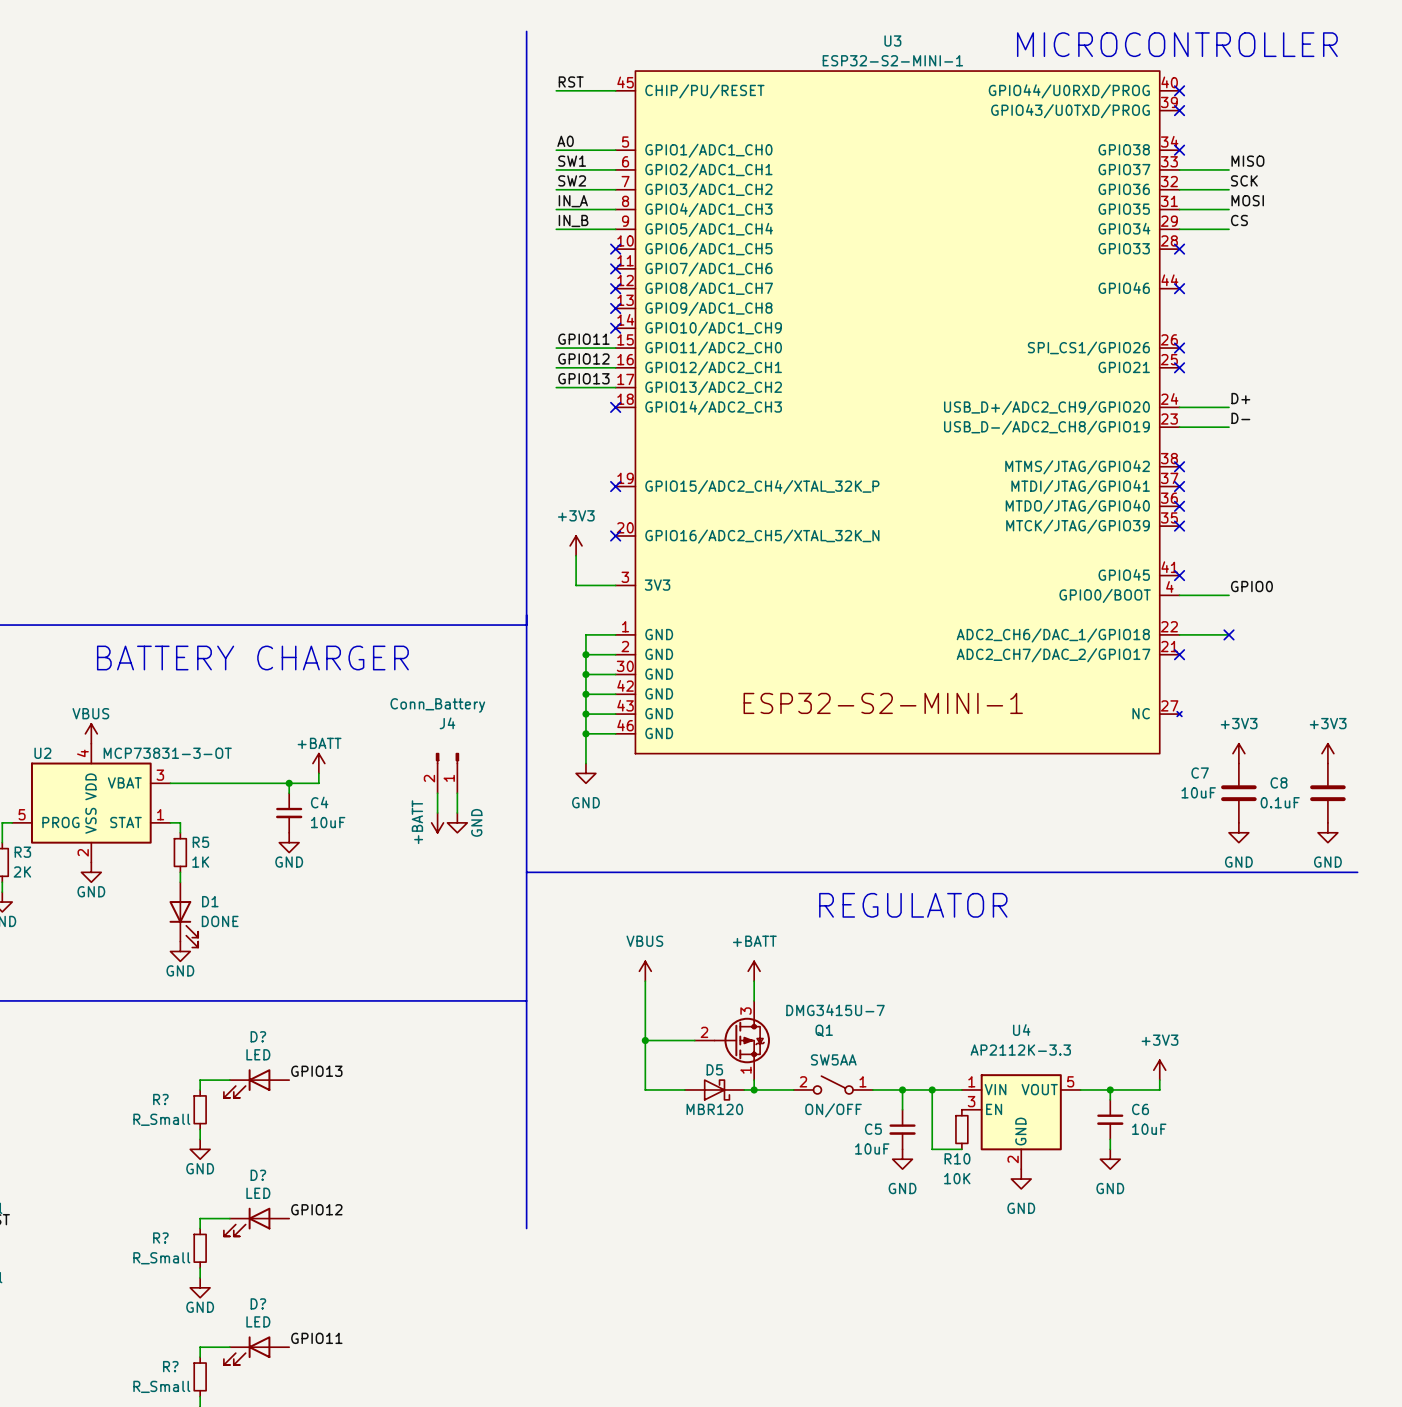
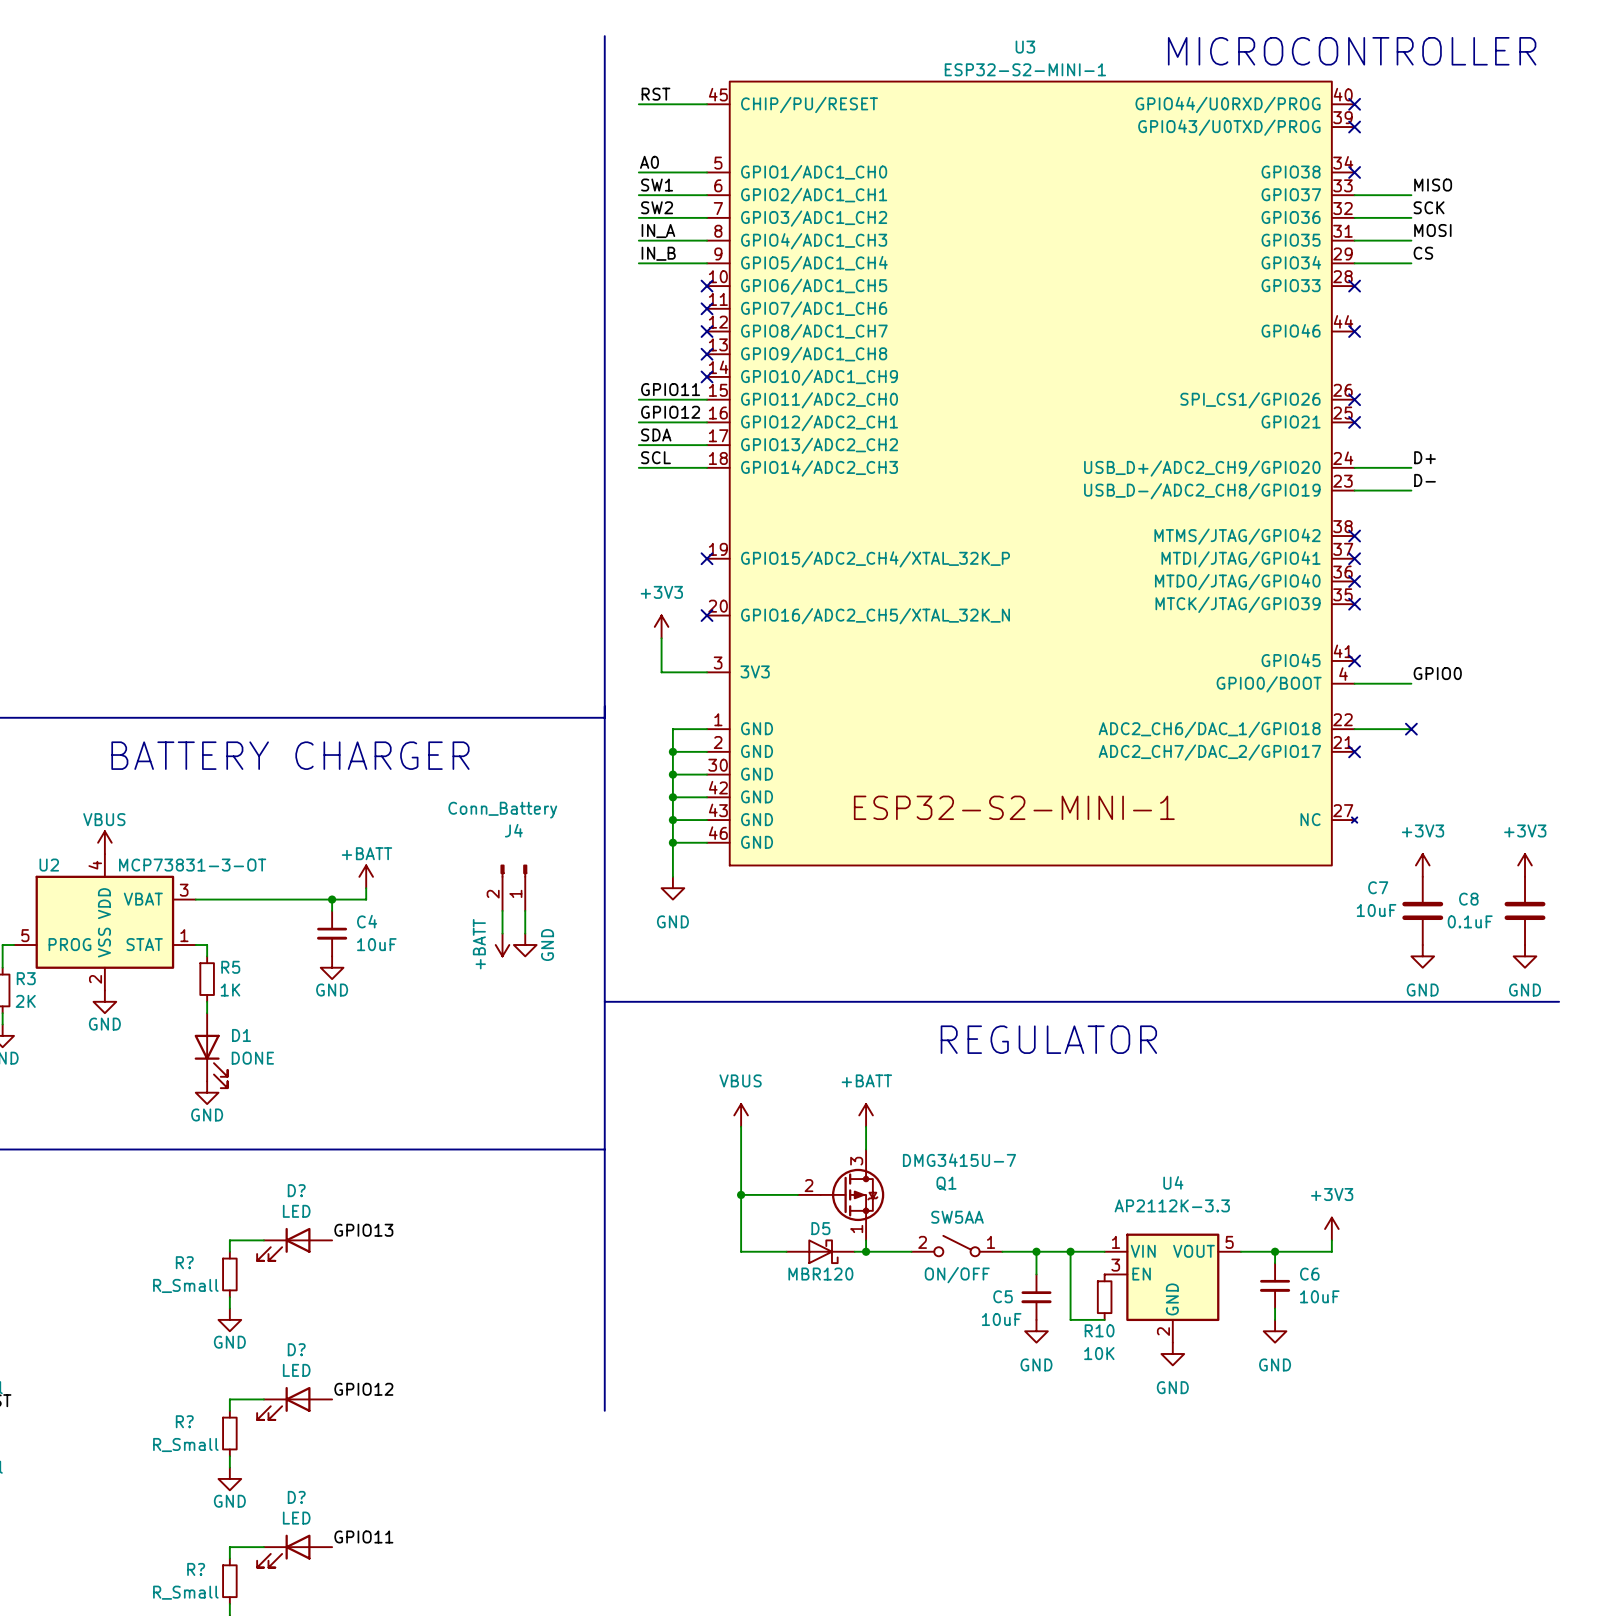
label: GPIO13 (583, 378) -> SDA (656, 434)
label: none -> SCL (655, 457)
wire: none -> (638, 467) (707, 467)
no-connect mark: (615, 407) -> none

